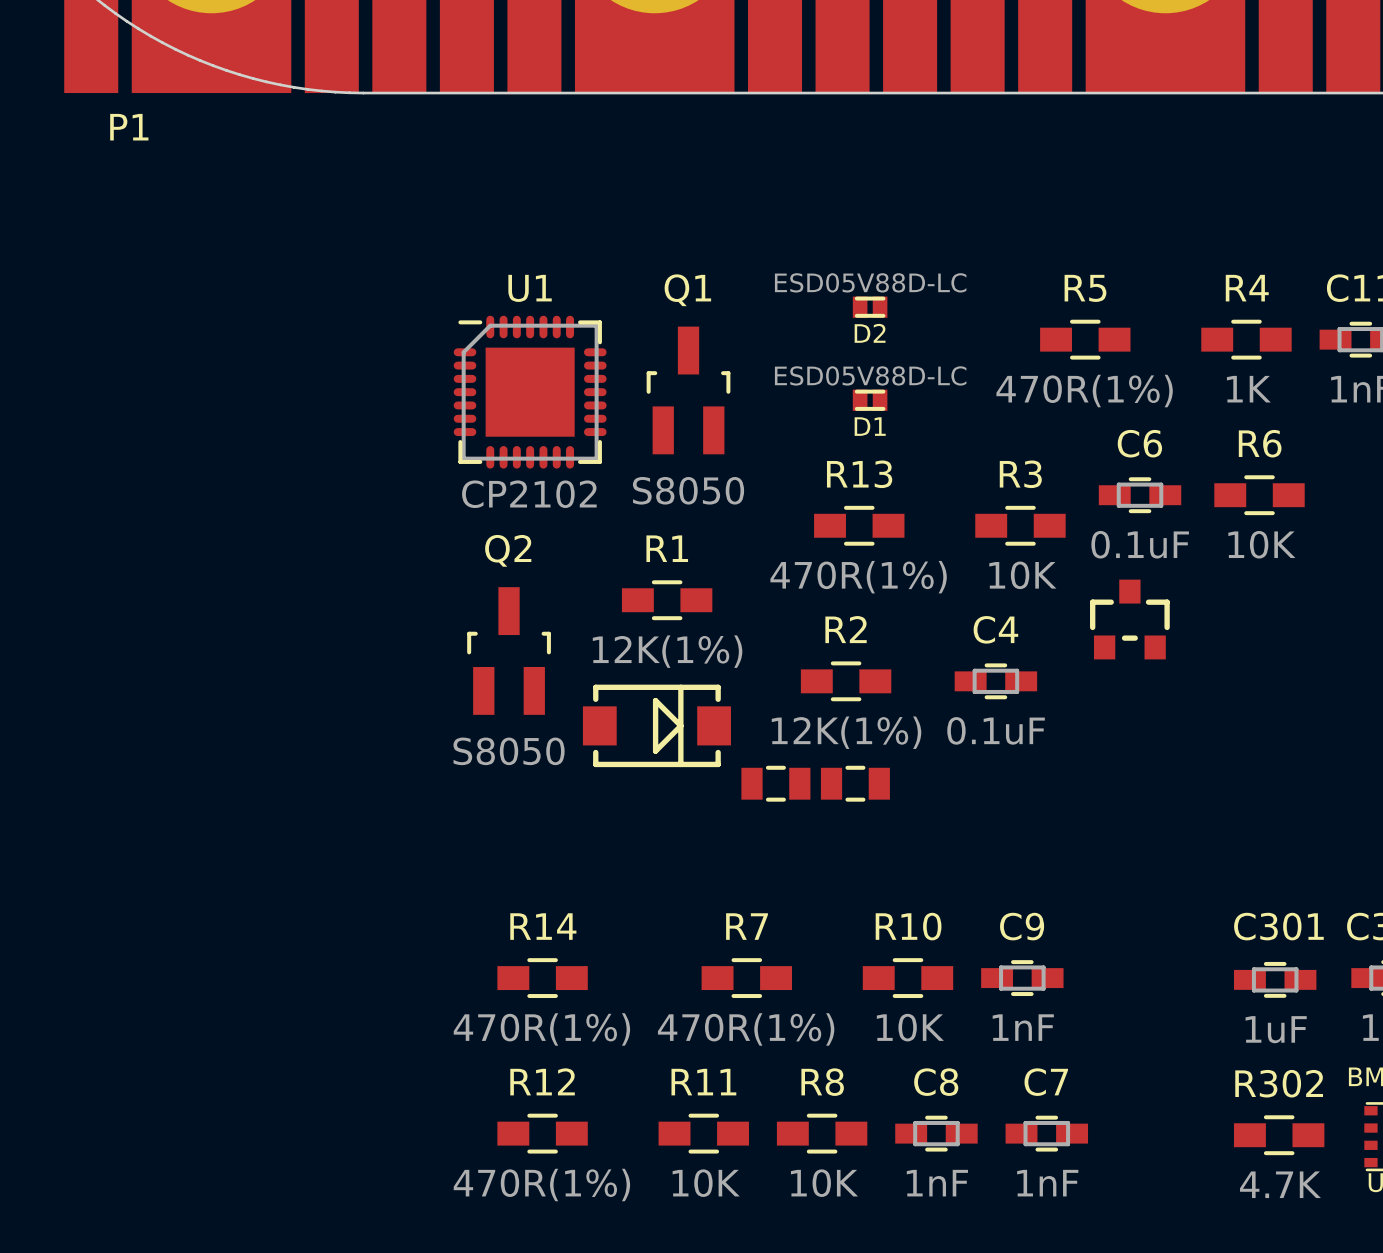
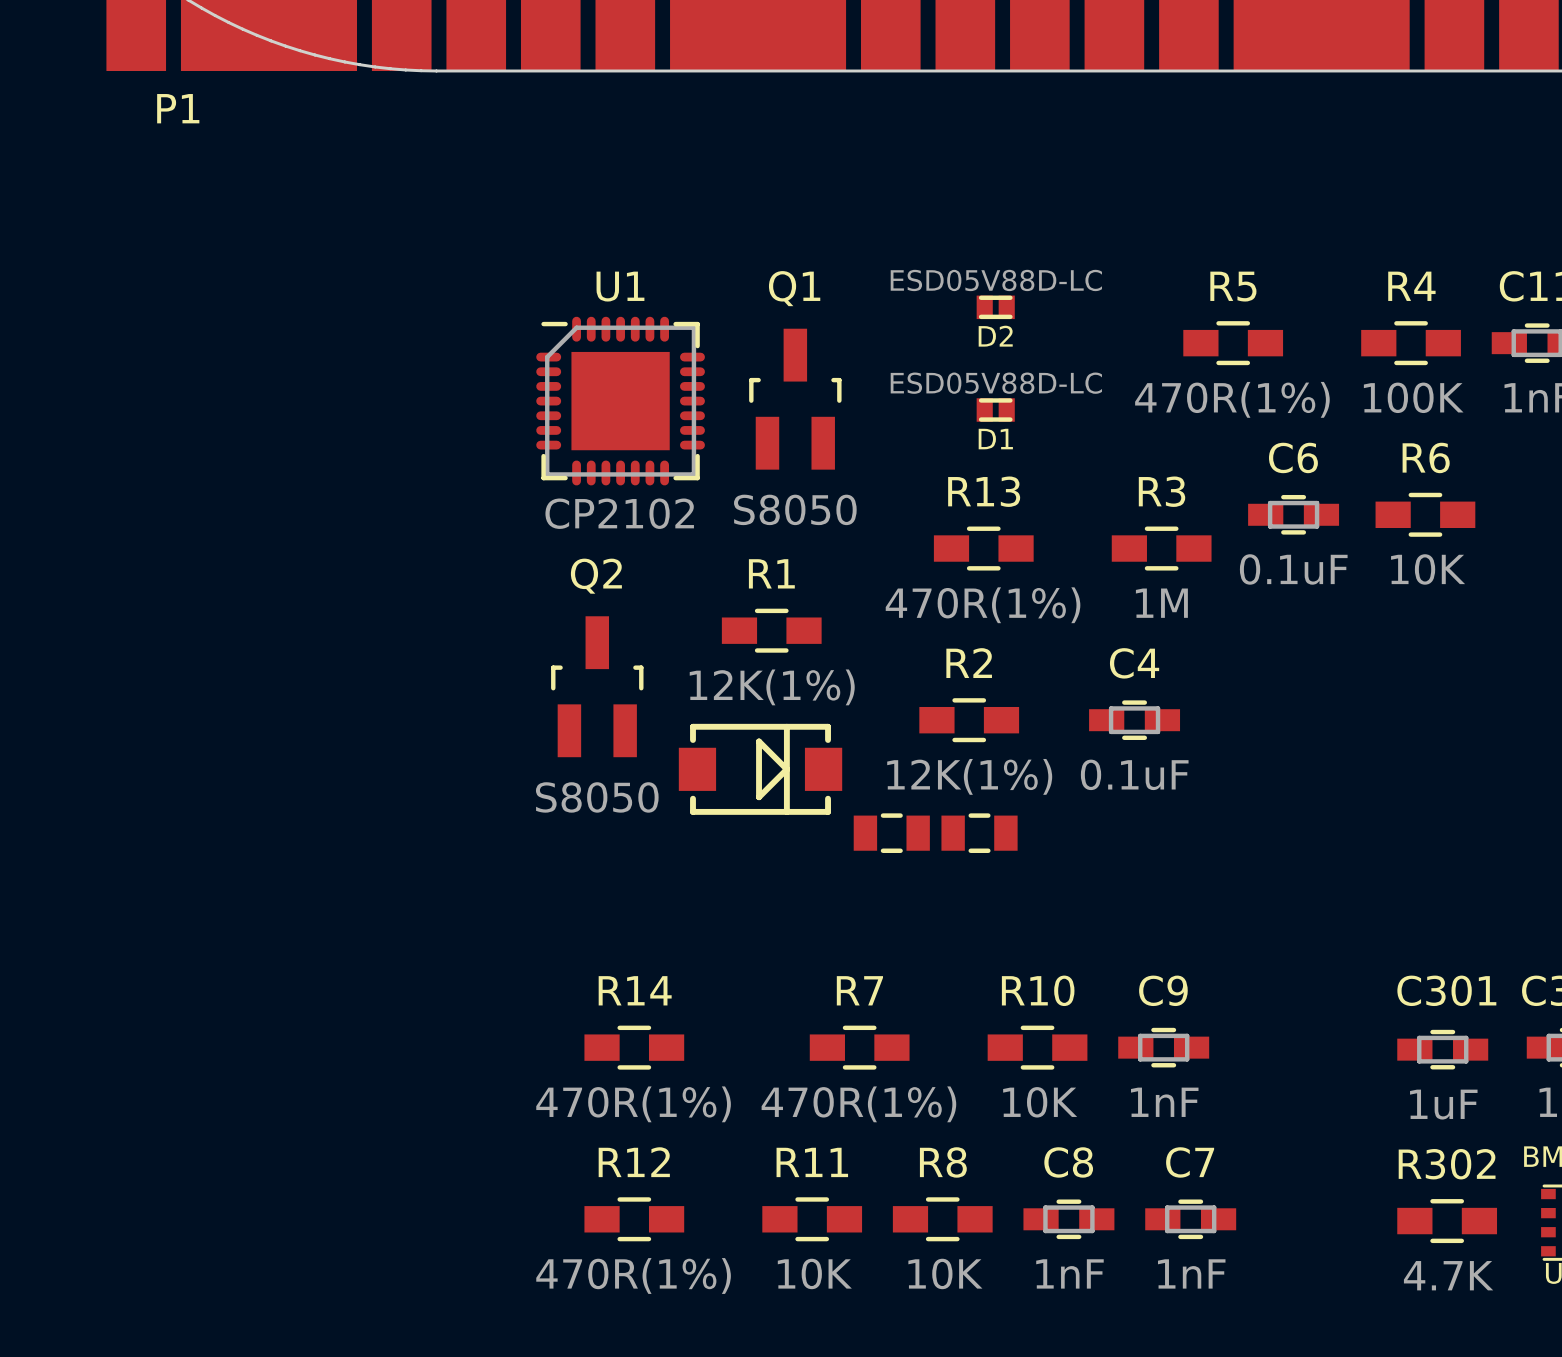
R4 value: 1K (1248, 389) -> 100K (1413, 397)
R3 value: 10K (1022, 575) -> 1M (1161, 603)
part: (1129, 619) -> none

